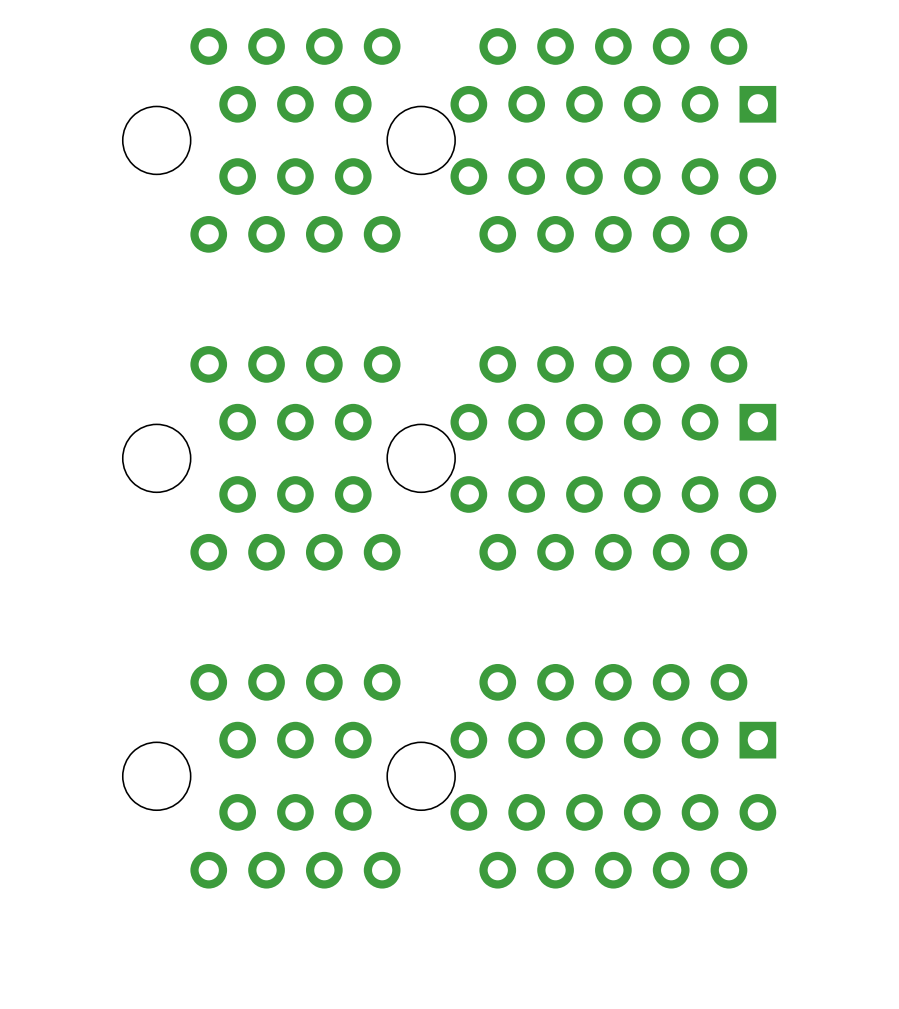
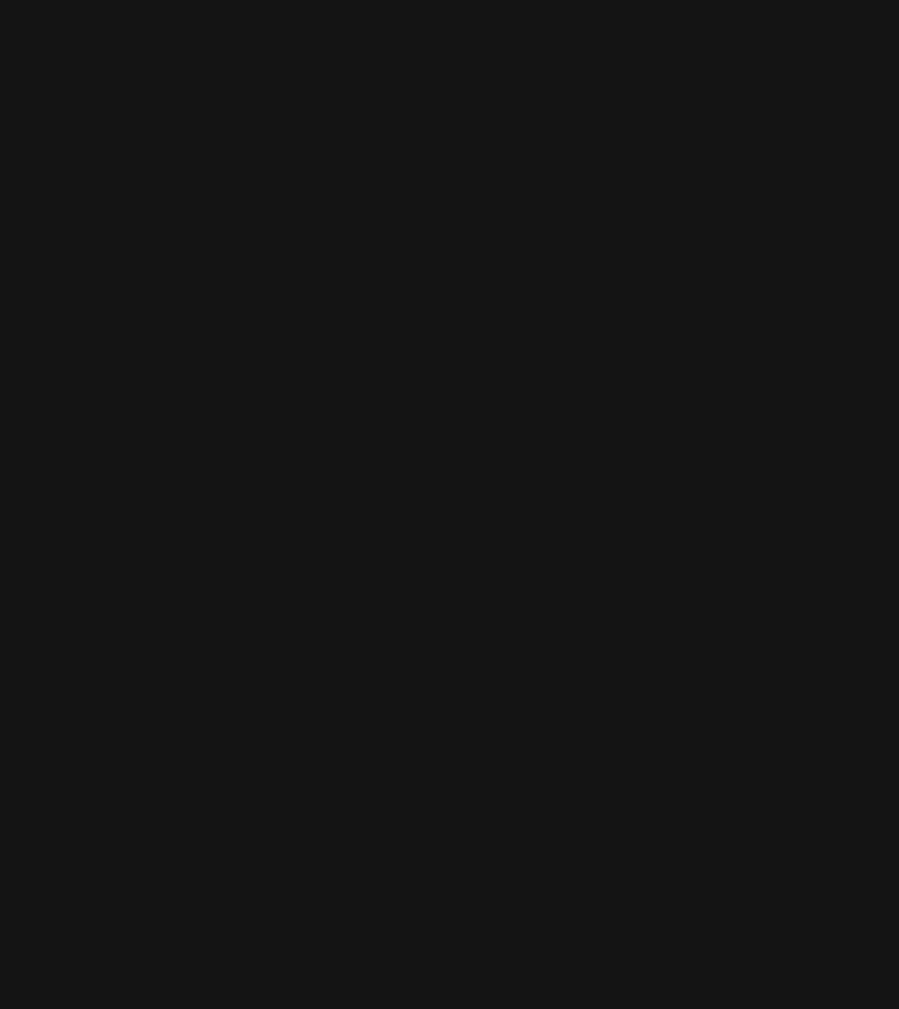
part: (449, 140) -> none
part: (449, 458) -> none
part: (449, 776) -> none

